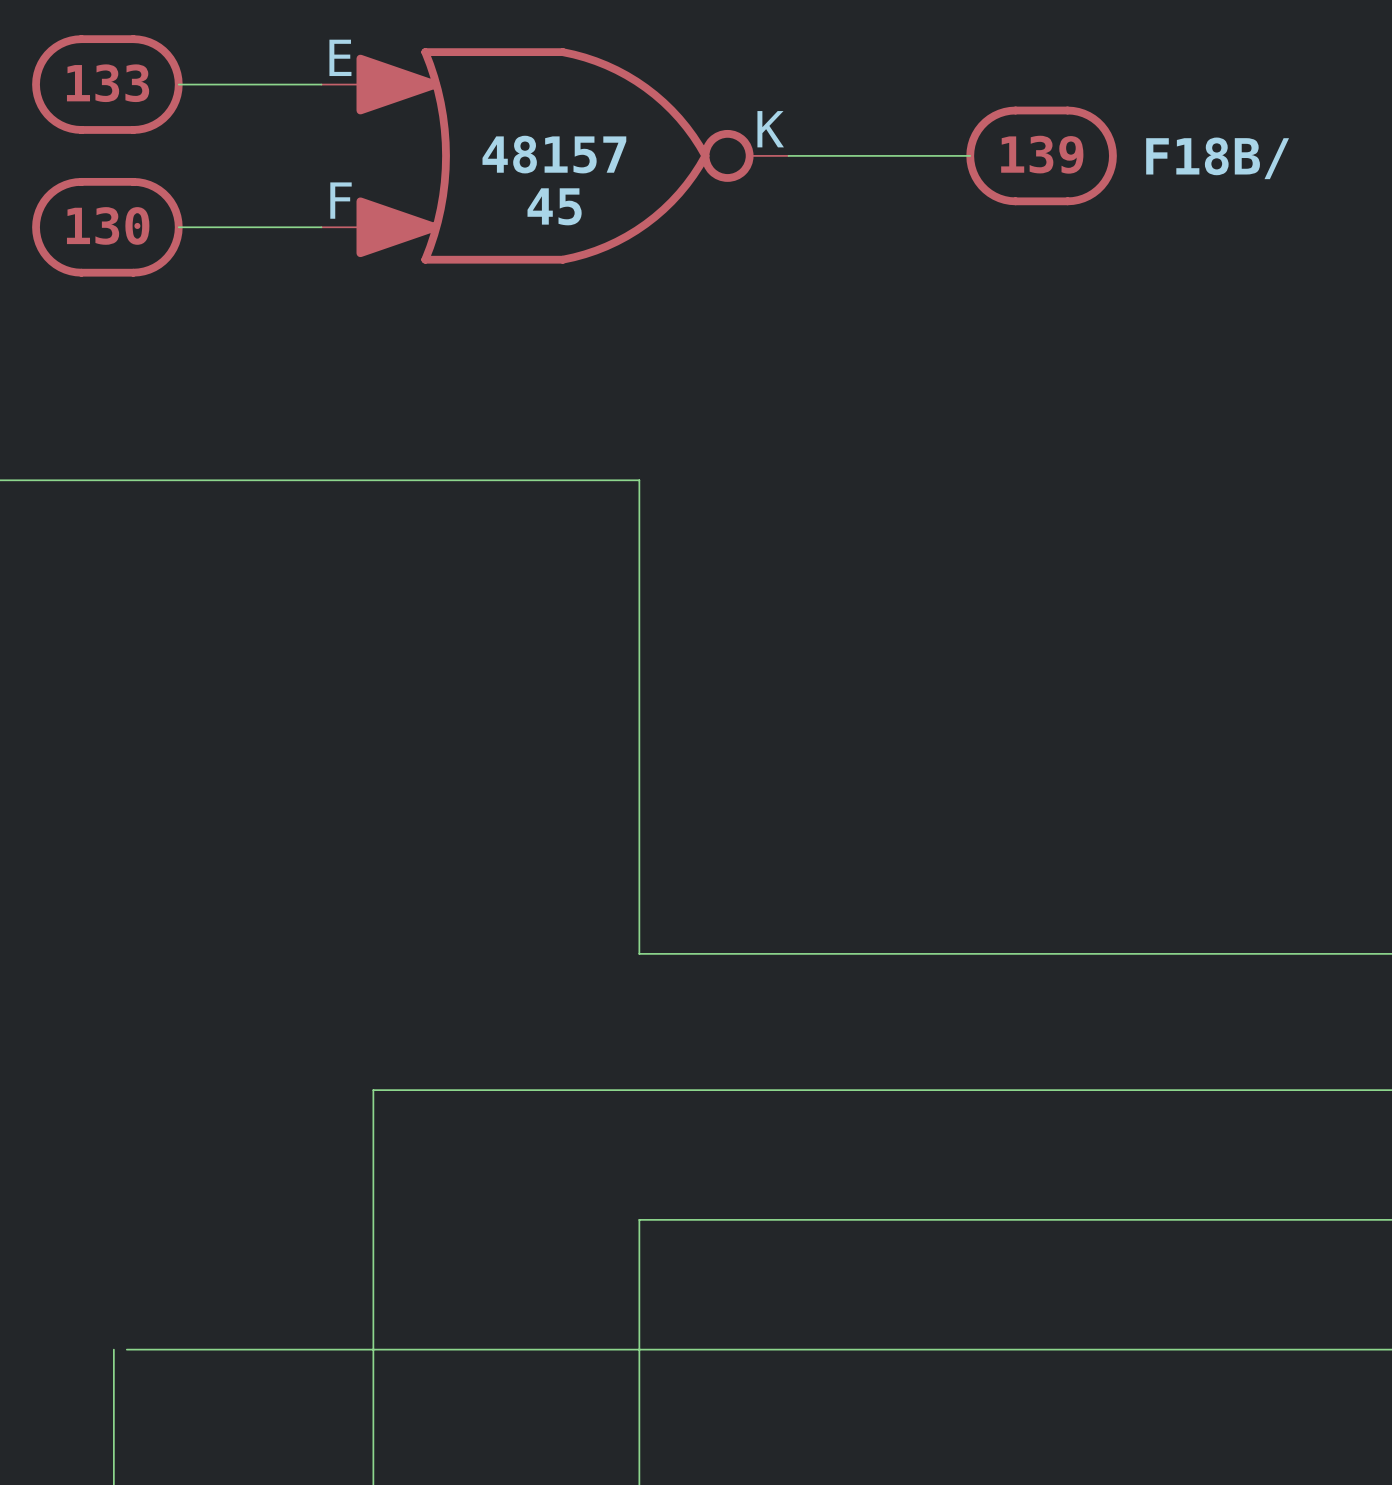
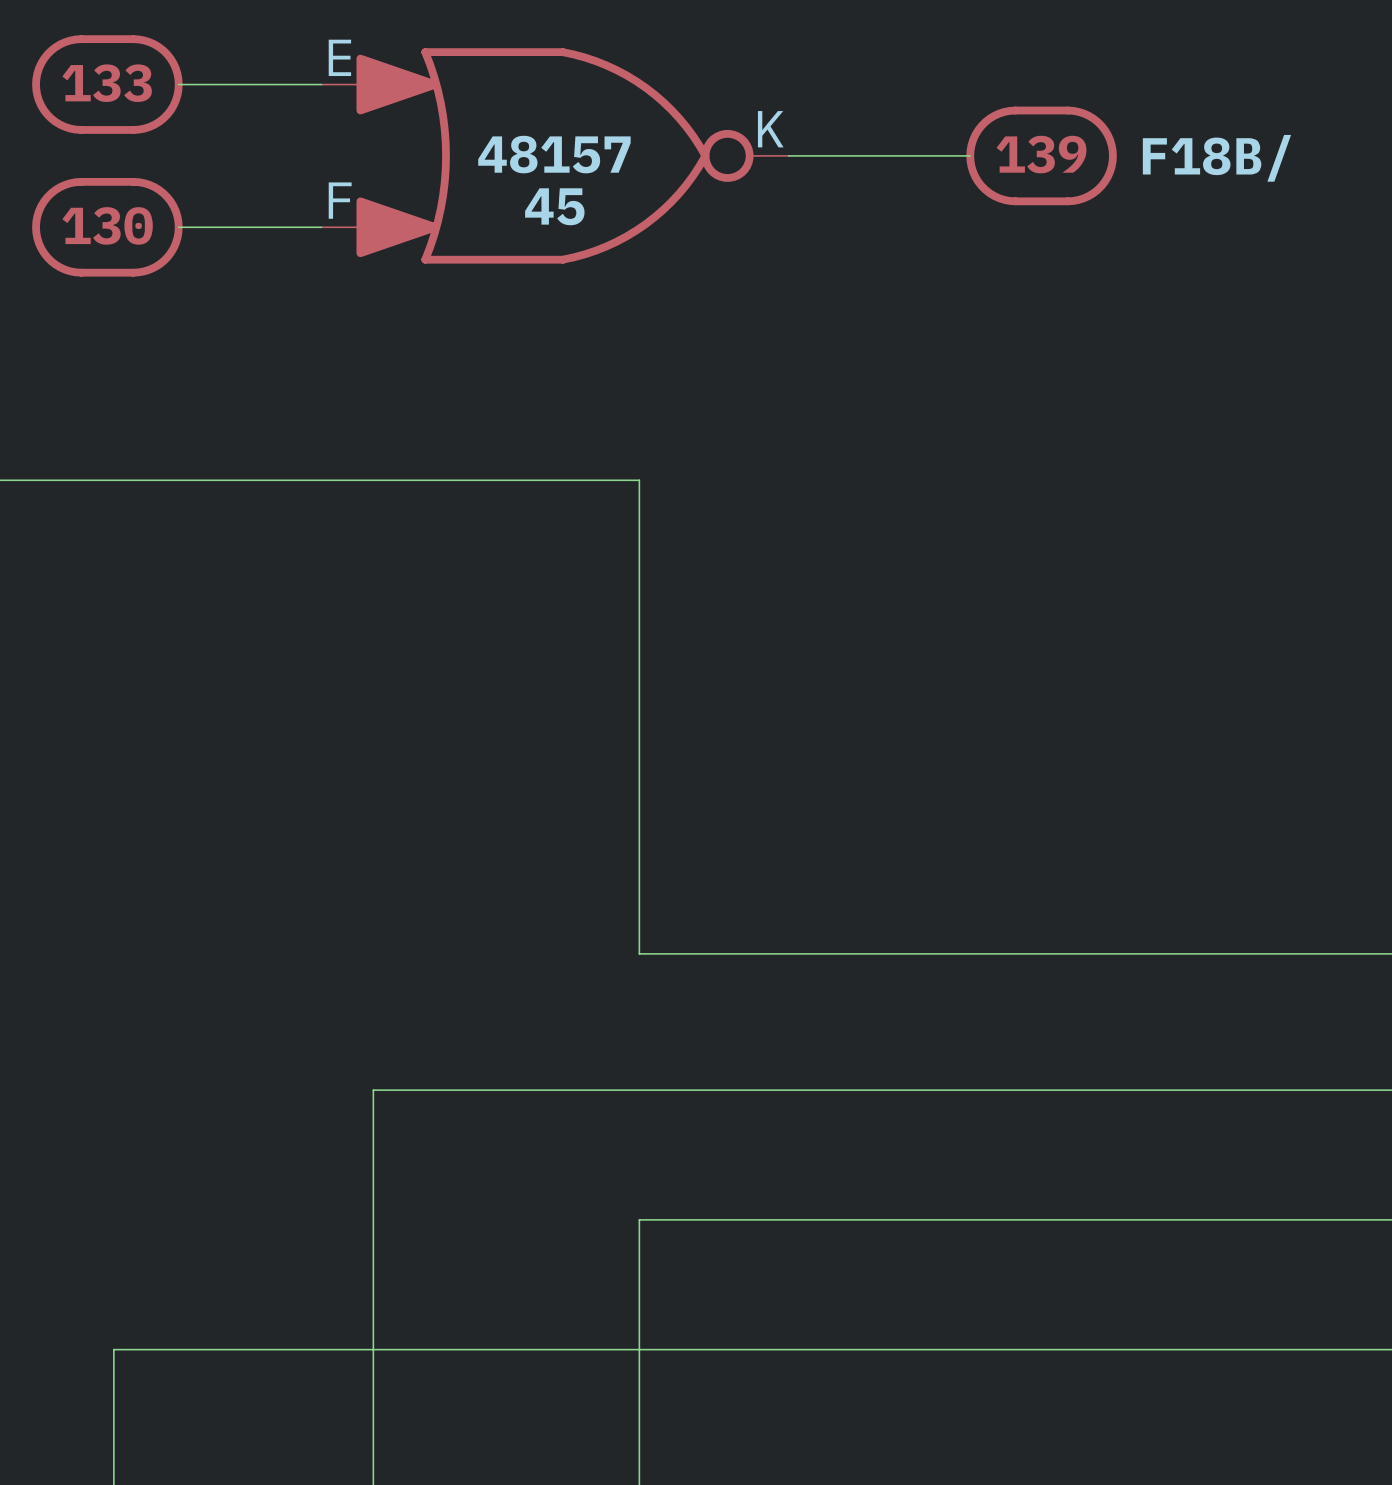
wire: none -> (113, 1349) (126, 1349)

